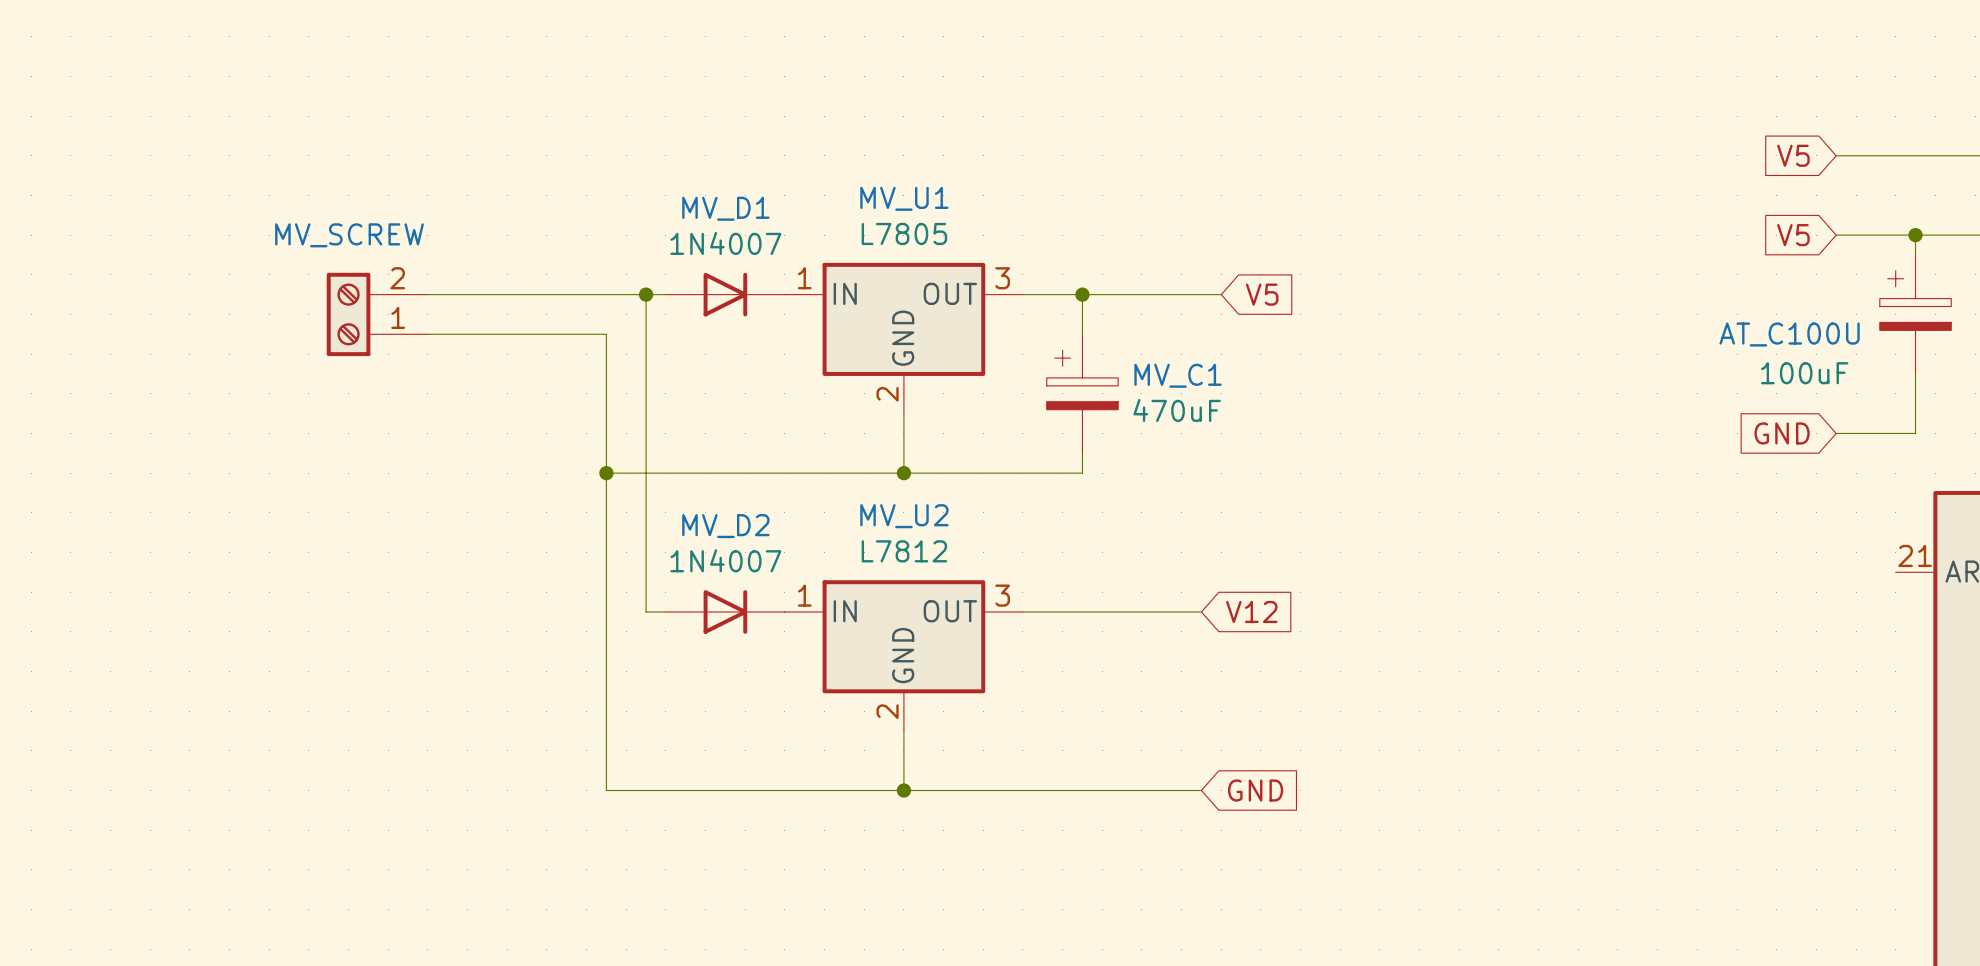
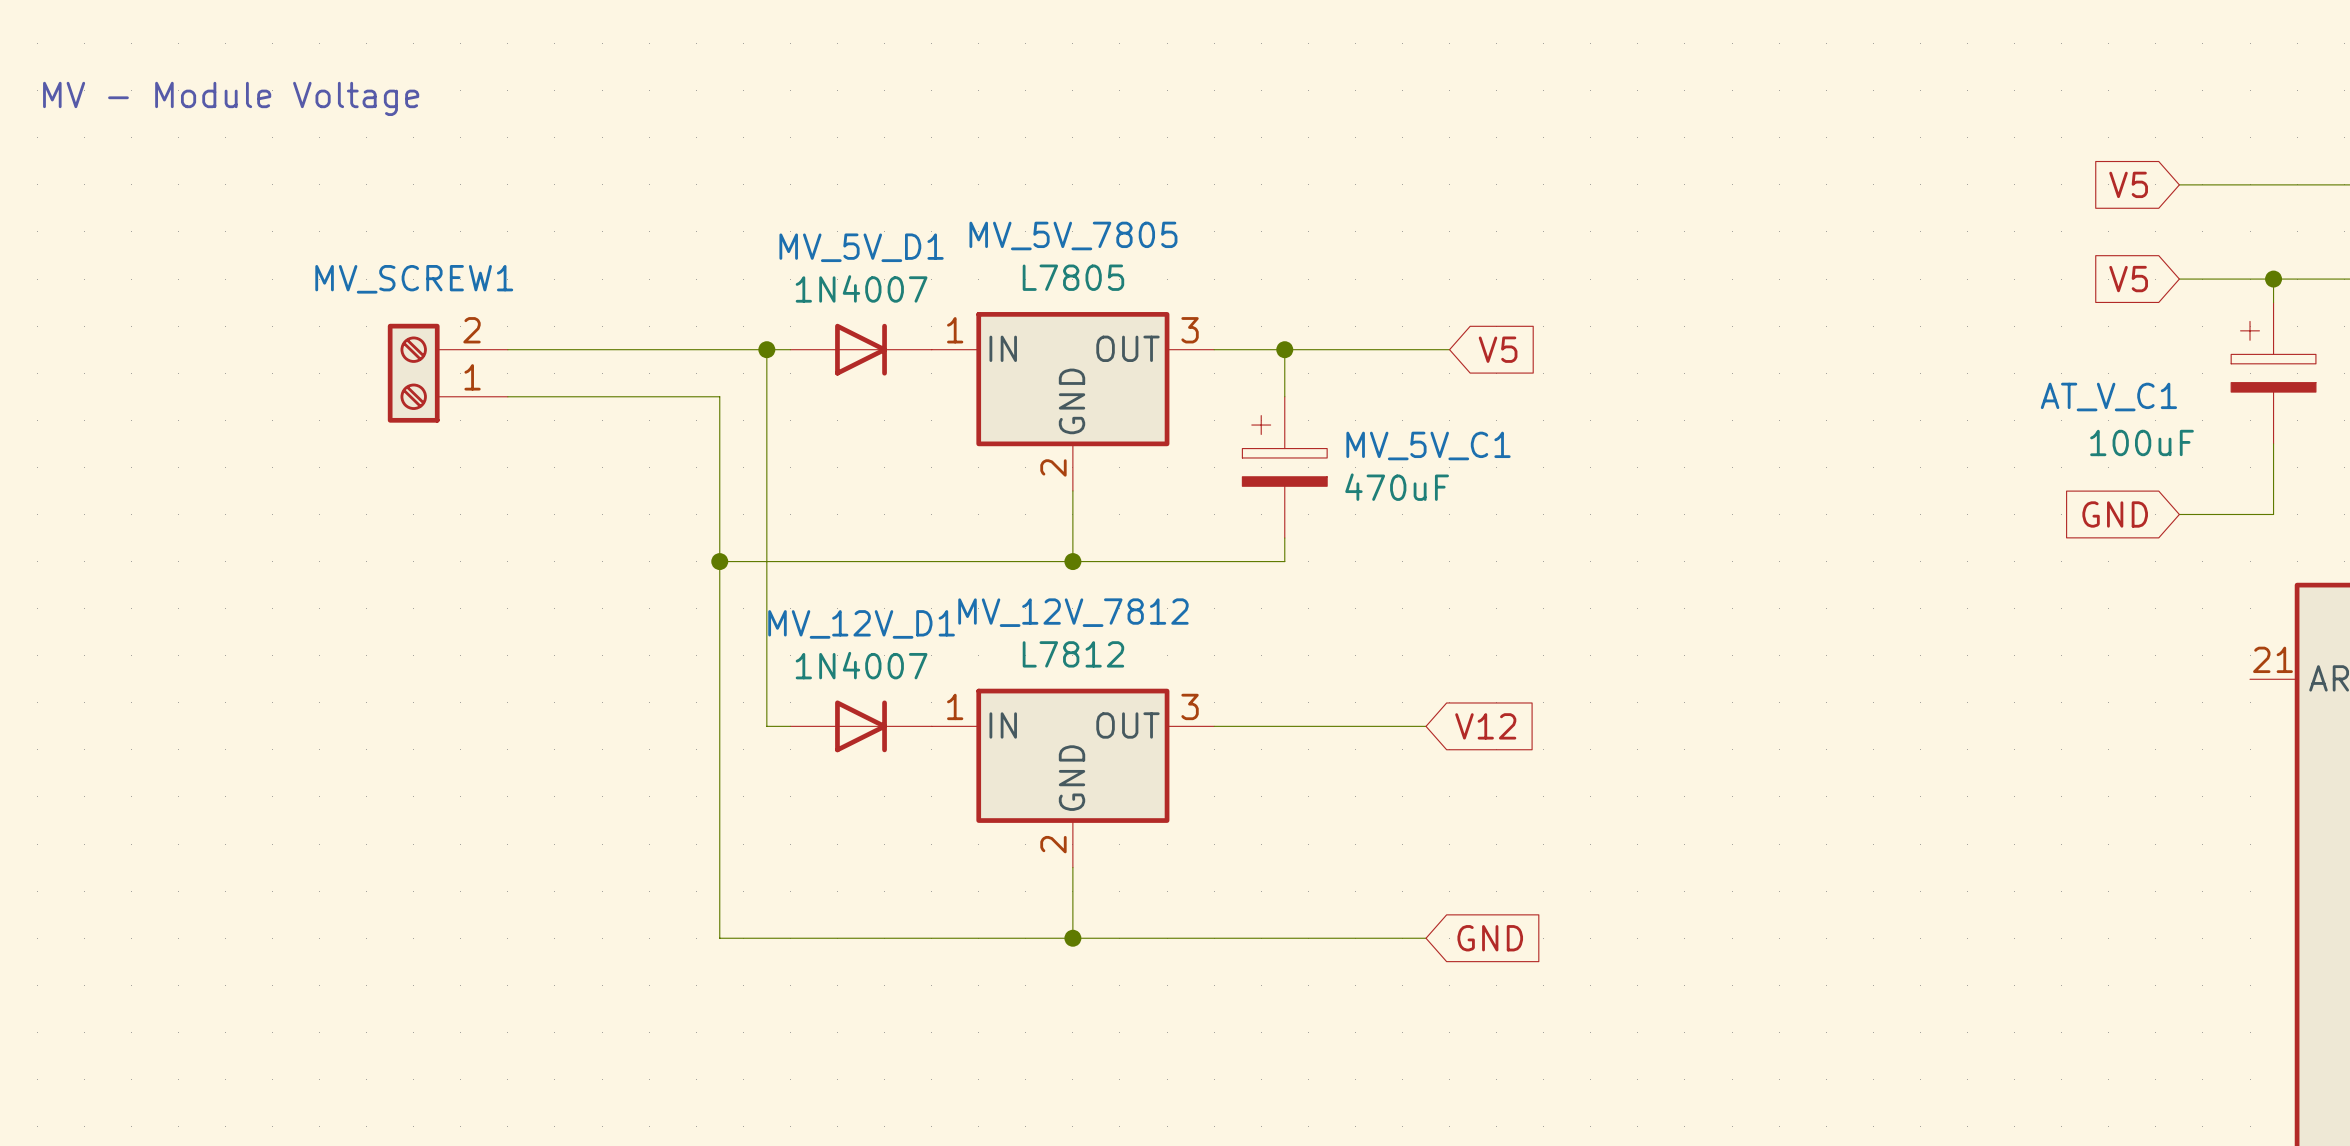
text: none -> MV - Module Voltage (231, 98)
MV_U1 name: MV_U1 (904, 198) -> MV_5V_7805 (1073, 235)
MV_D1 name: MV_D1 (725, 208) -> MV_5V_D1 (861, 247)
MV_SCREW name: MV_SCREW (349, 235) -> MV_SCREW1 (414, 279)
AT_C100U name: AT_C100U (1789, 334) -> AT_V_C1 (2108, 397)
MV_C1 name: MV_C1 (1178, 375) -> MV_5V_C1 (1428, 445)
MV_U2 name: MV_U2 (904, 516) -> MV_12V_7812 (1073, 612)
MV_D2 name: MV_D2 (725, 526) -> MV_12V_D1 (861, 624)

